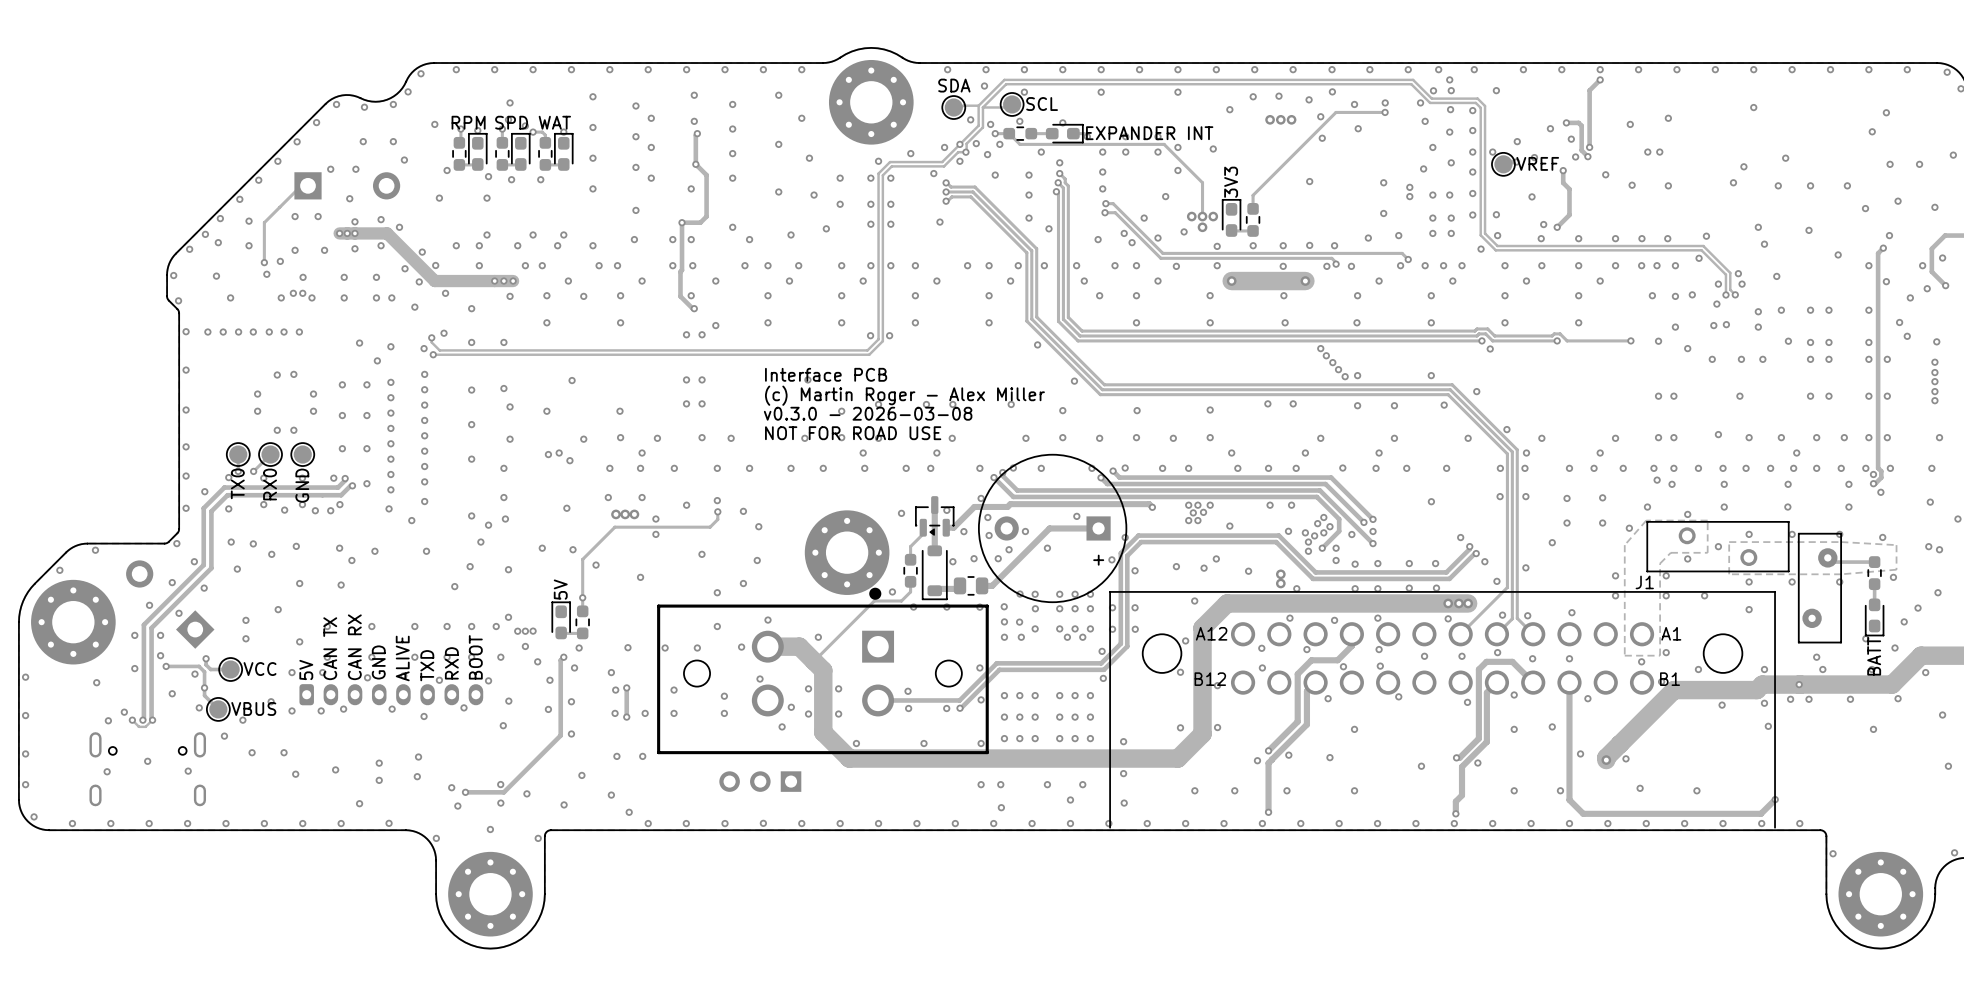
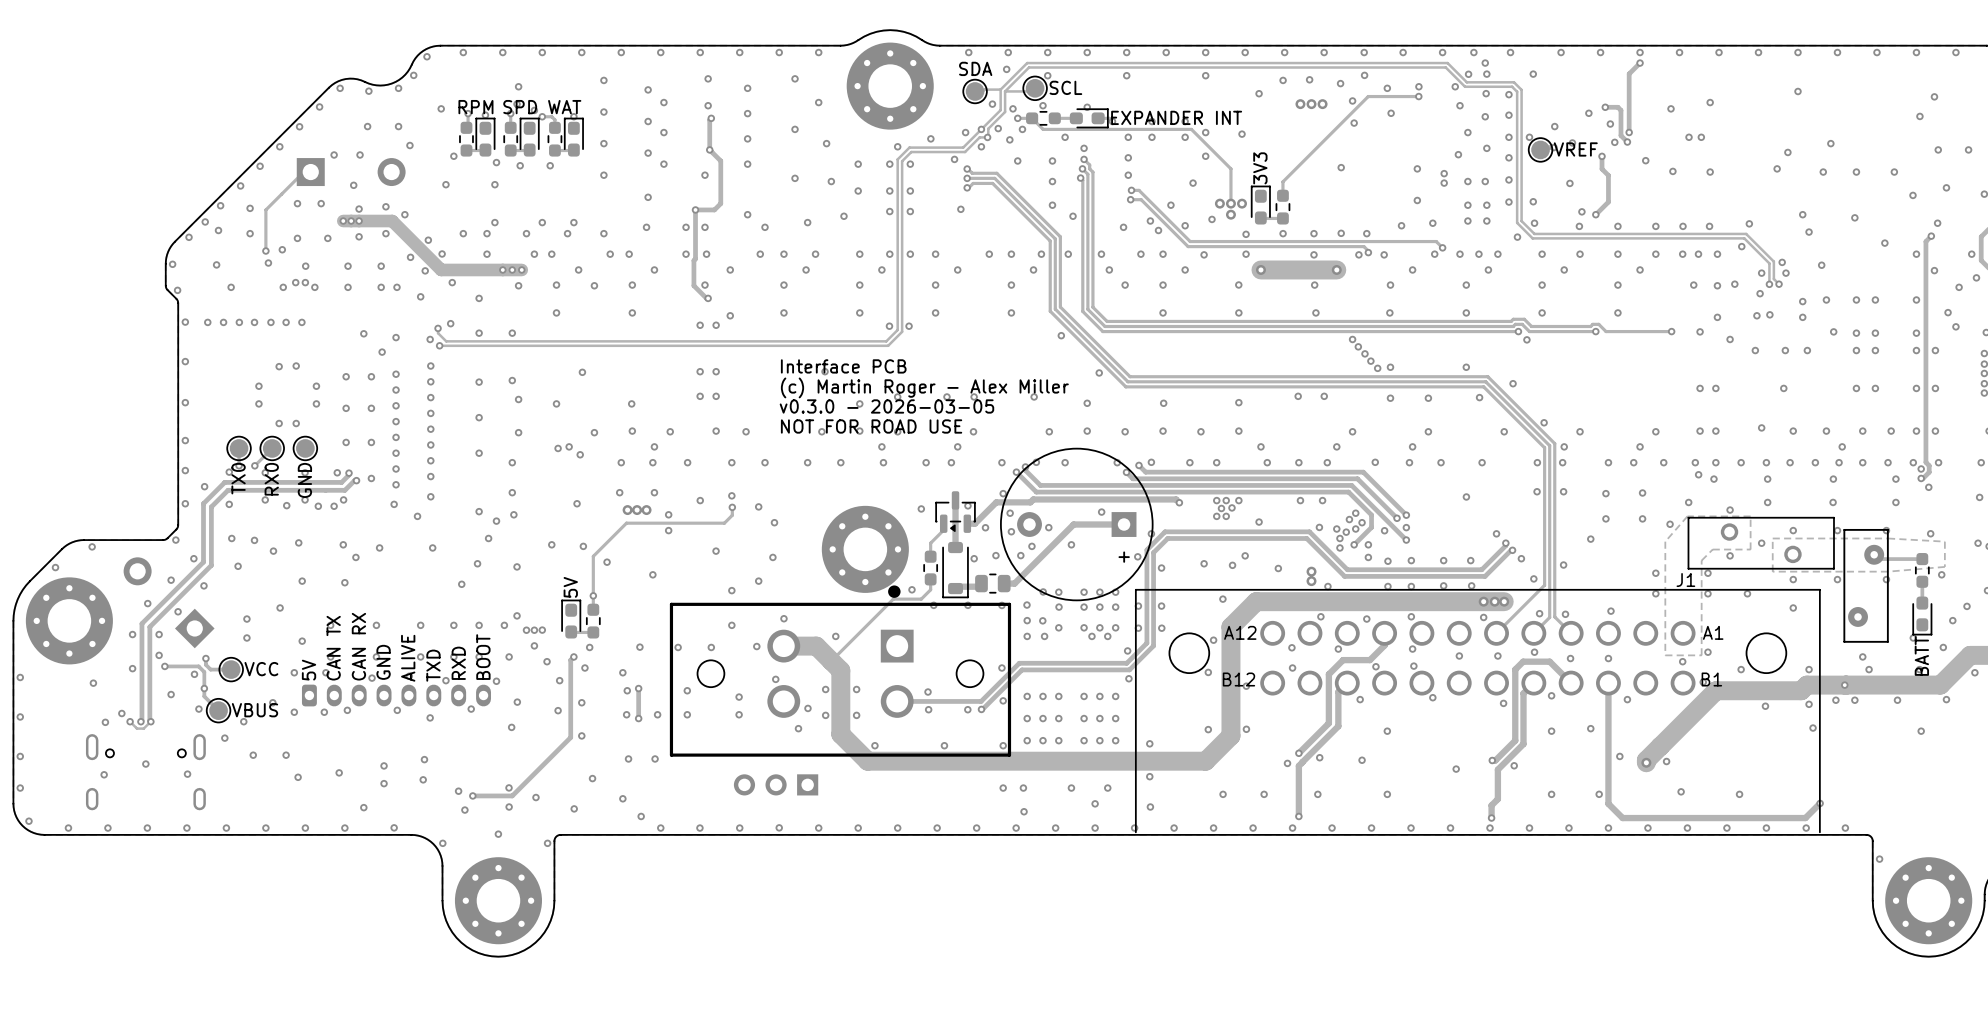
text: v0.3.0 - 2026-03-08 (868, 413) -> v0.3.0 - 2026-03-05 (886, 406)

